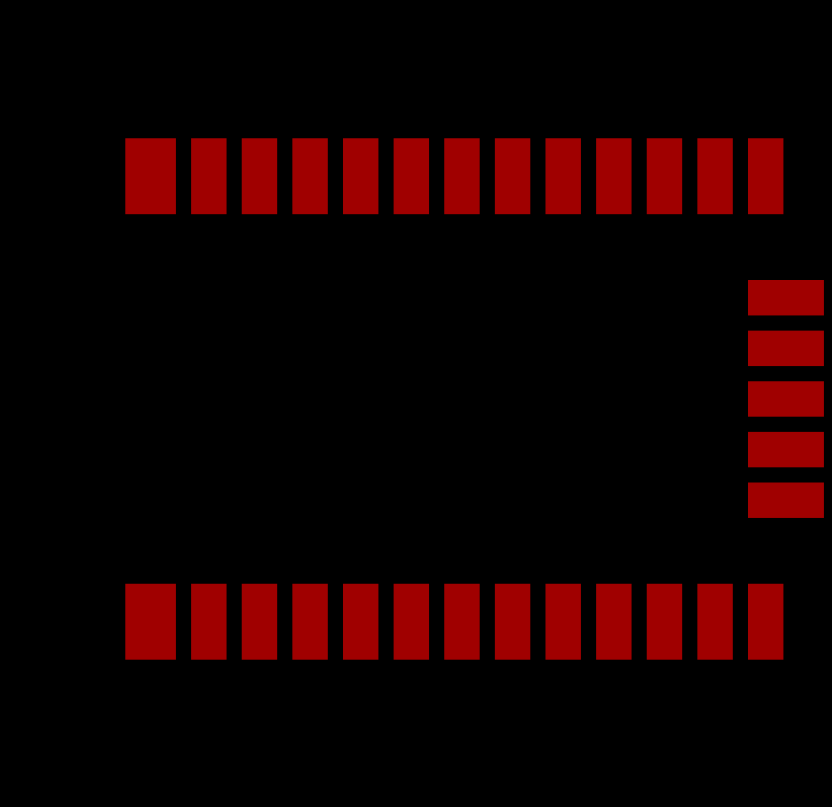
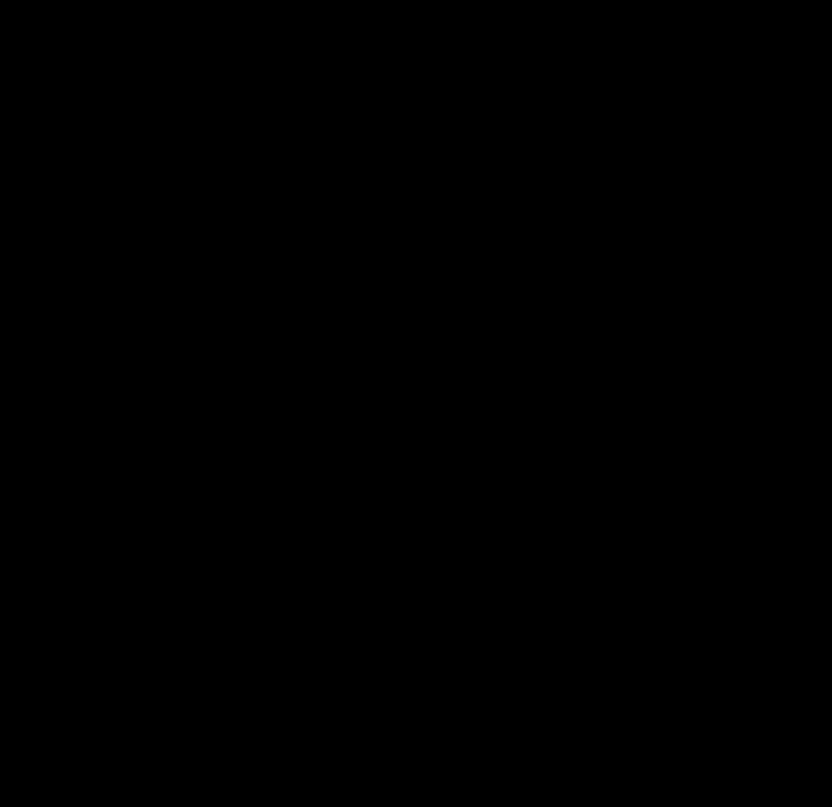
part: (474, 398) -> none

